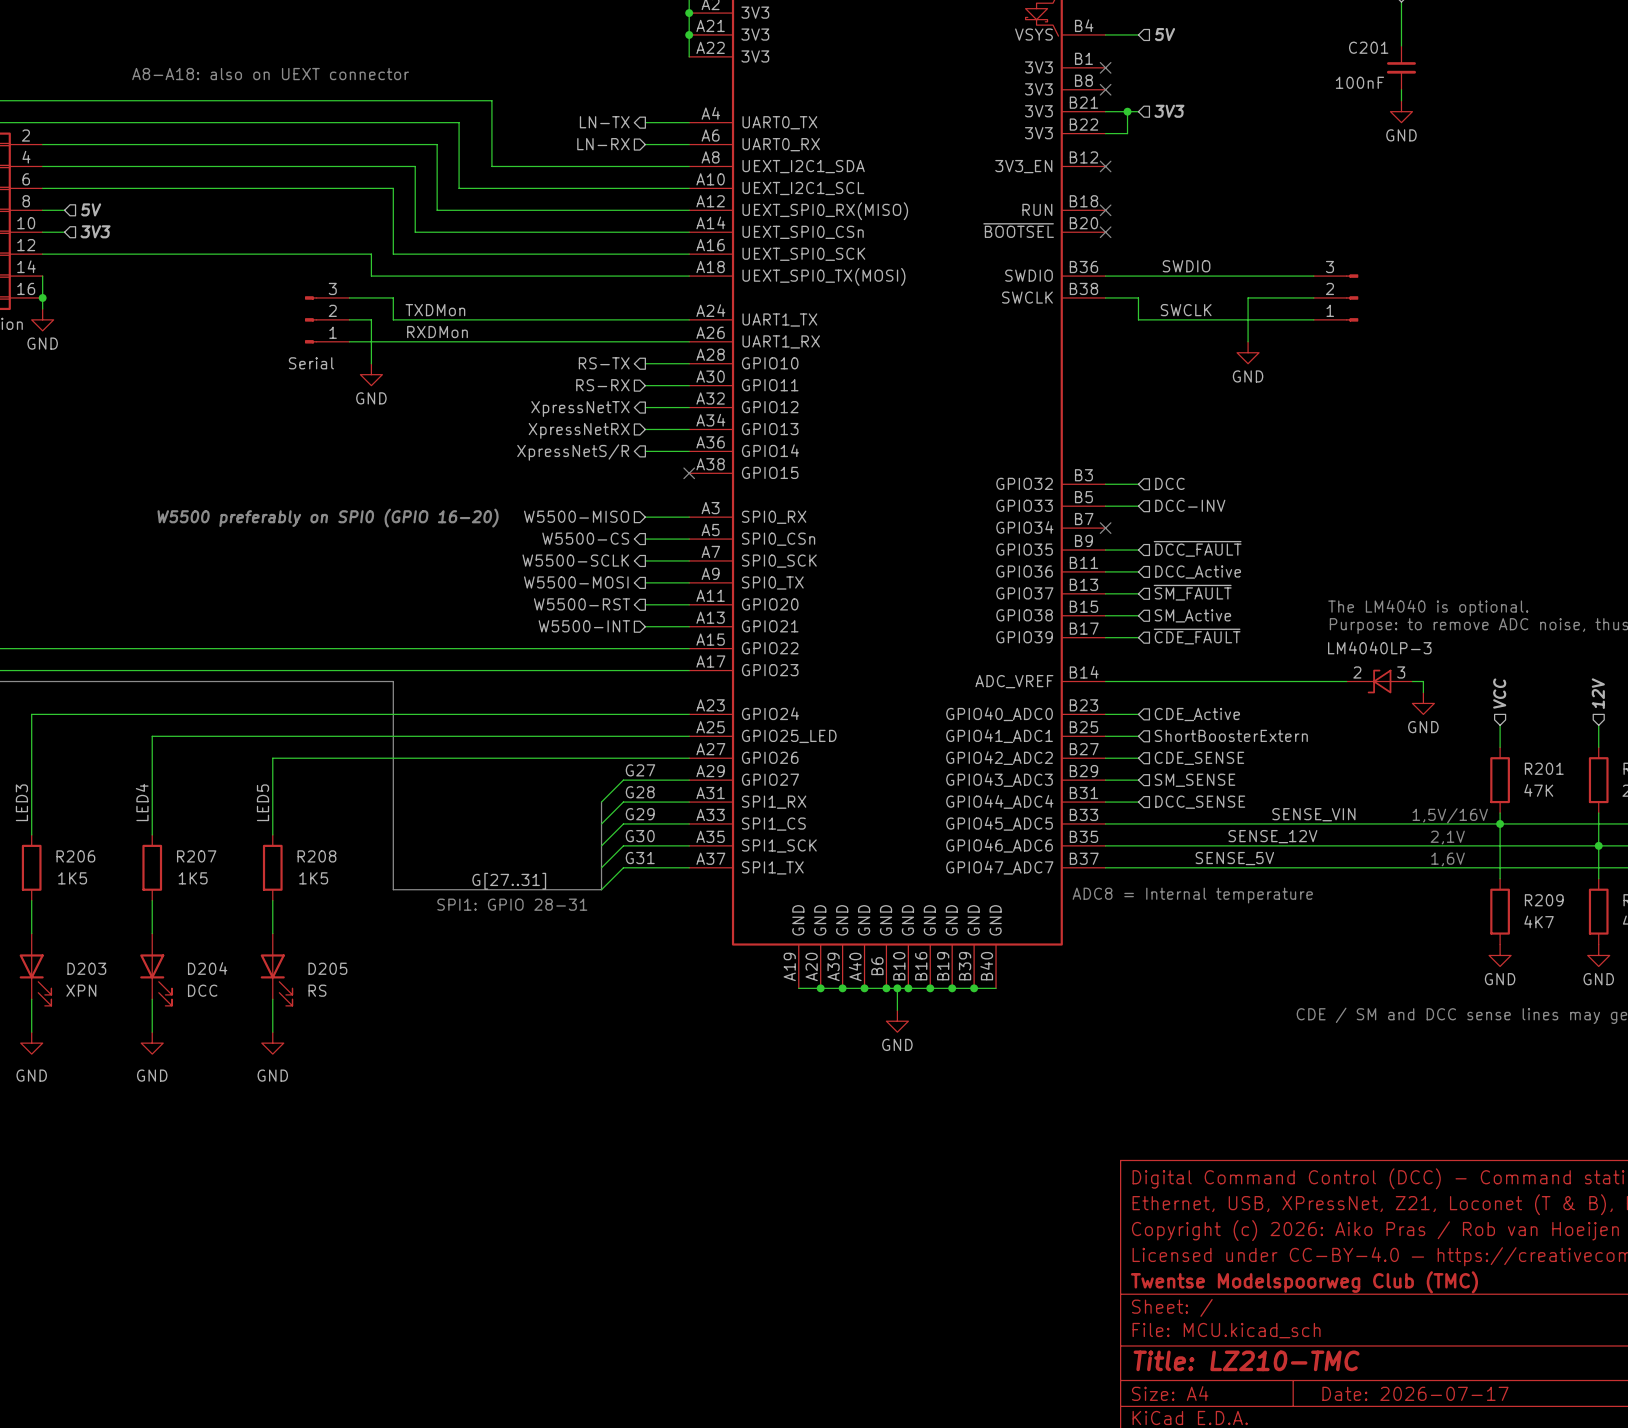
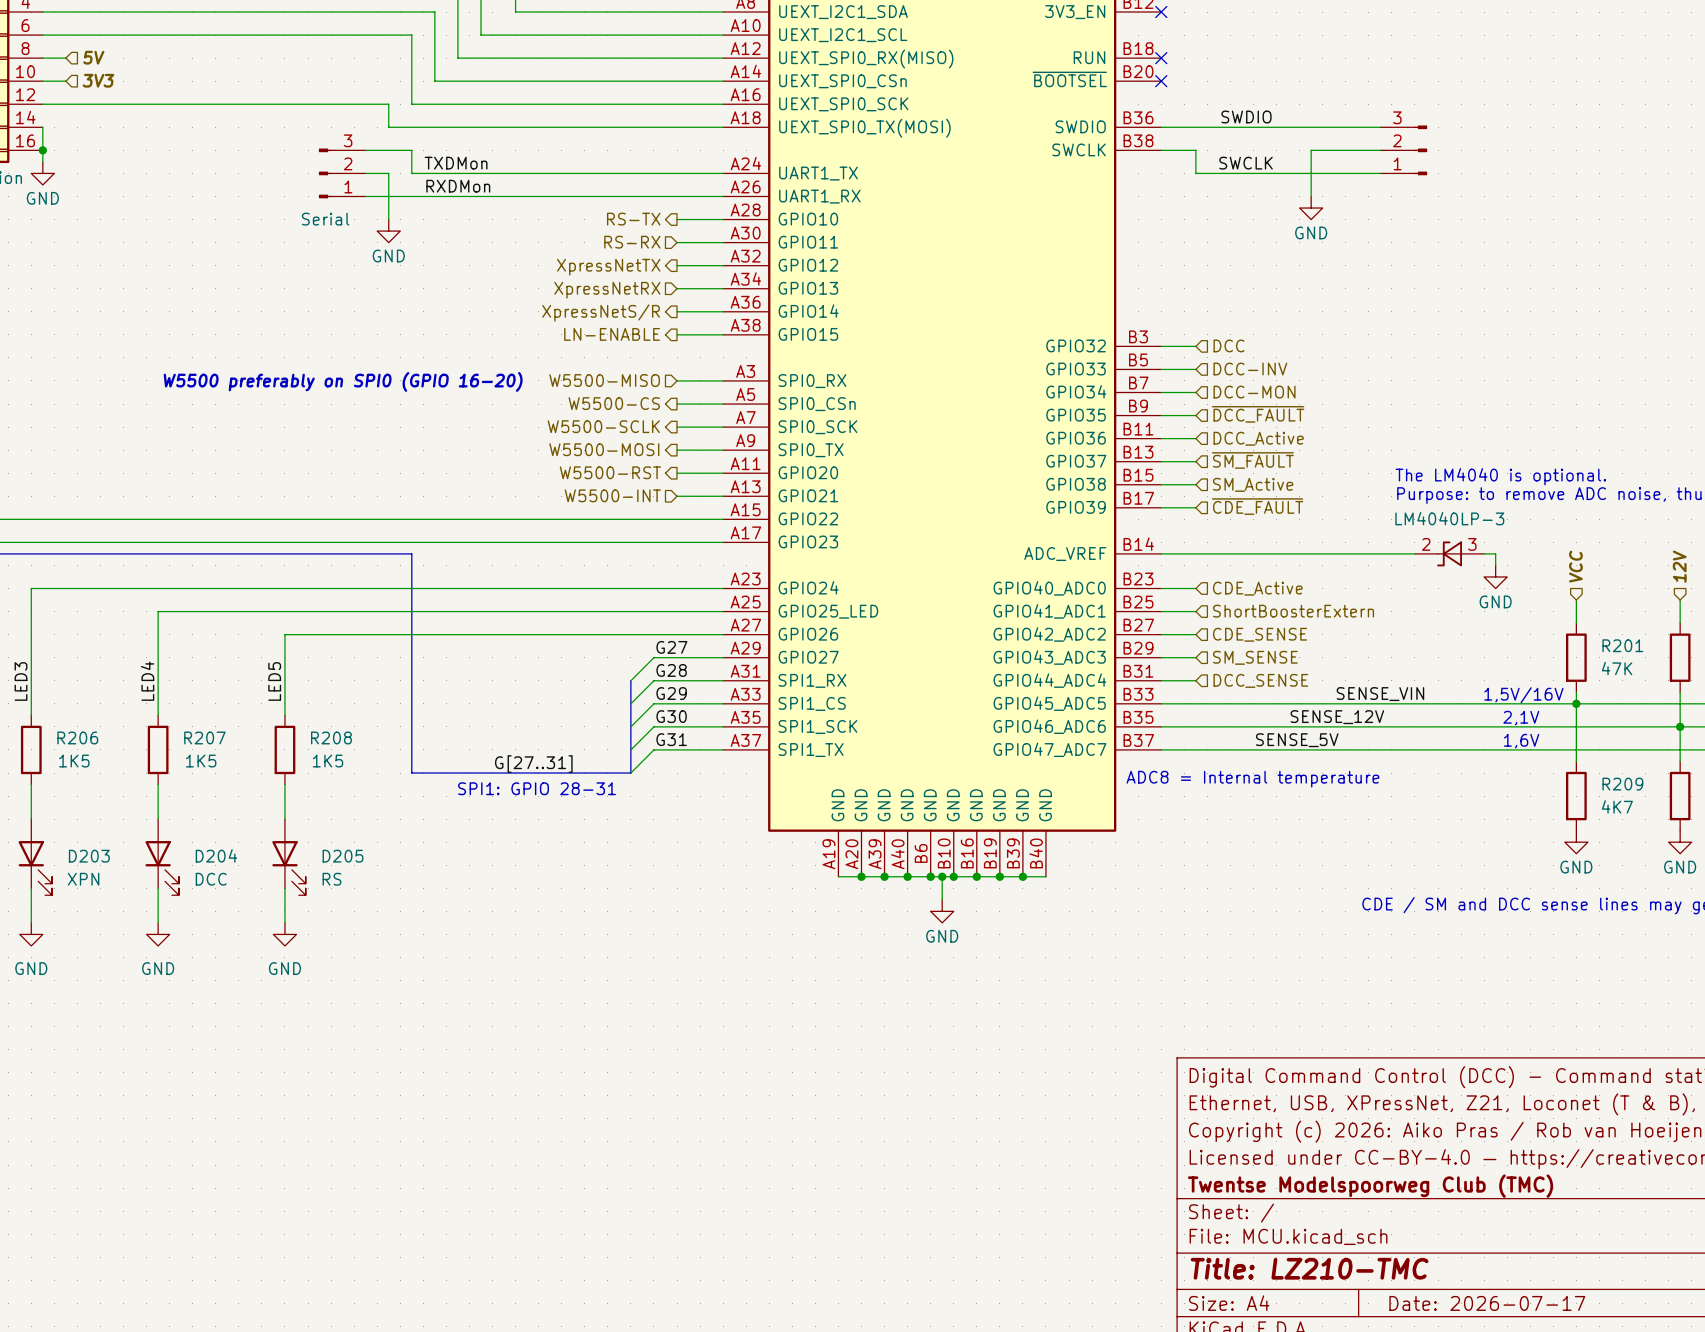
hierarchical label: none -> LN-ENABLE (612, 334)
wire: none -> (677, 334) (723, 334)
no-connect mark: (689, 473) -> none
hierarchical label: none -> DCC-MON (1254, 392)
wire: none -> (1161, 392) (1195, 392)
no-connect mark: (1105, 528) -> none

